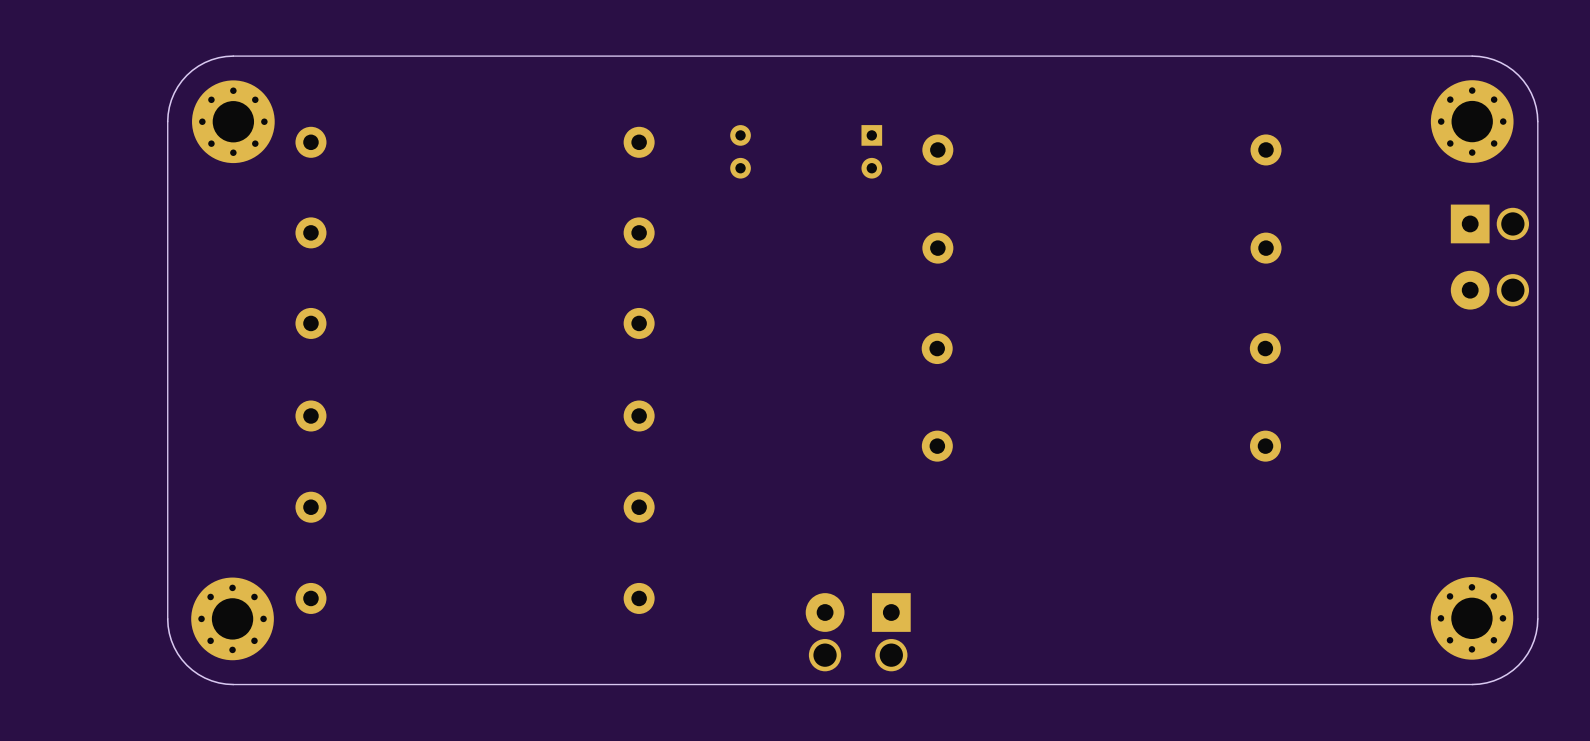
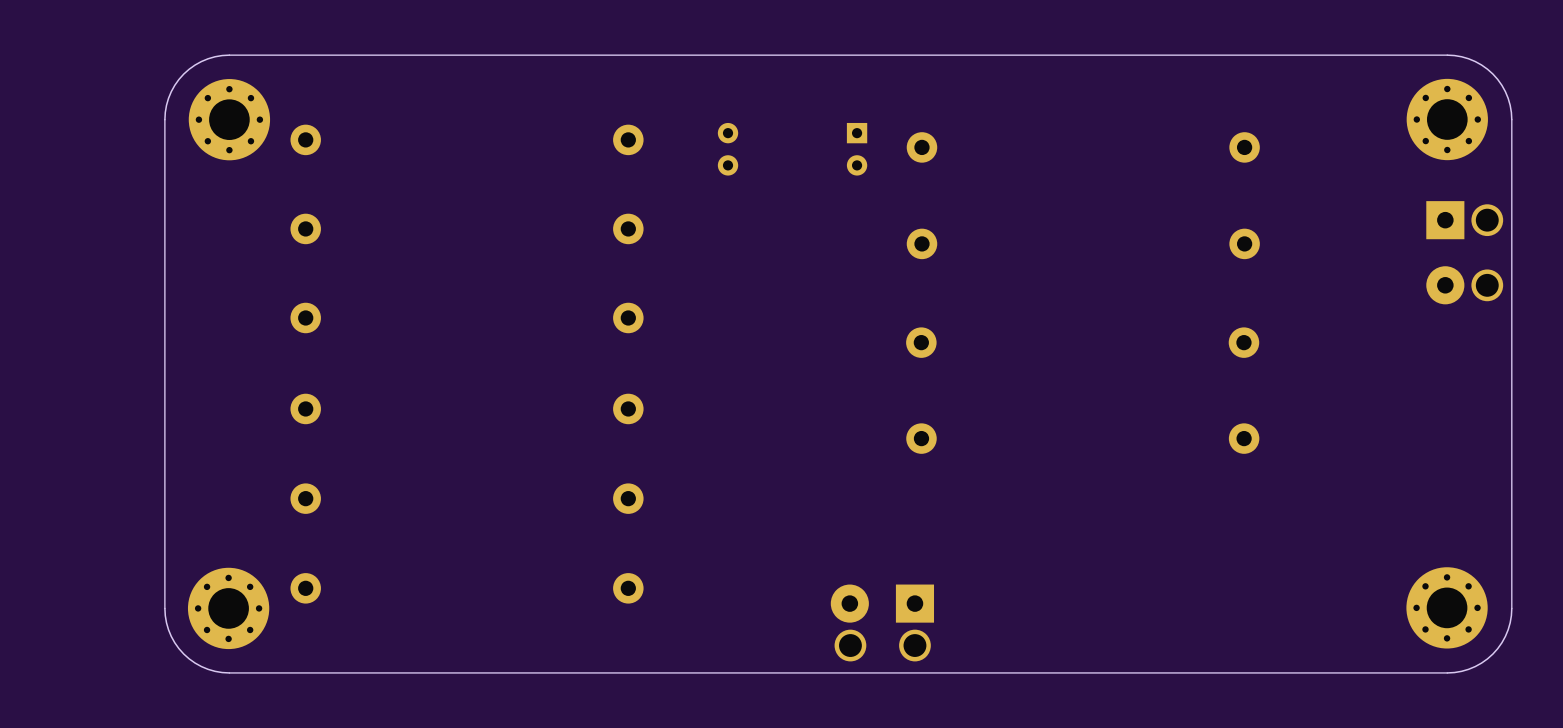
part: (858, 632) -> none
part: none -> (882, 622)

